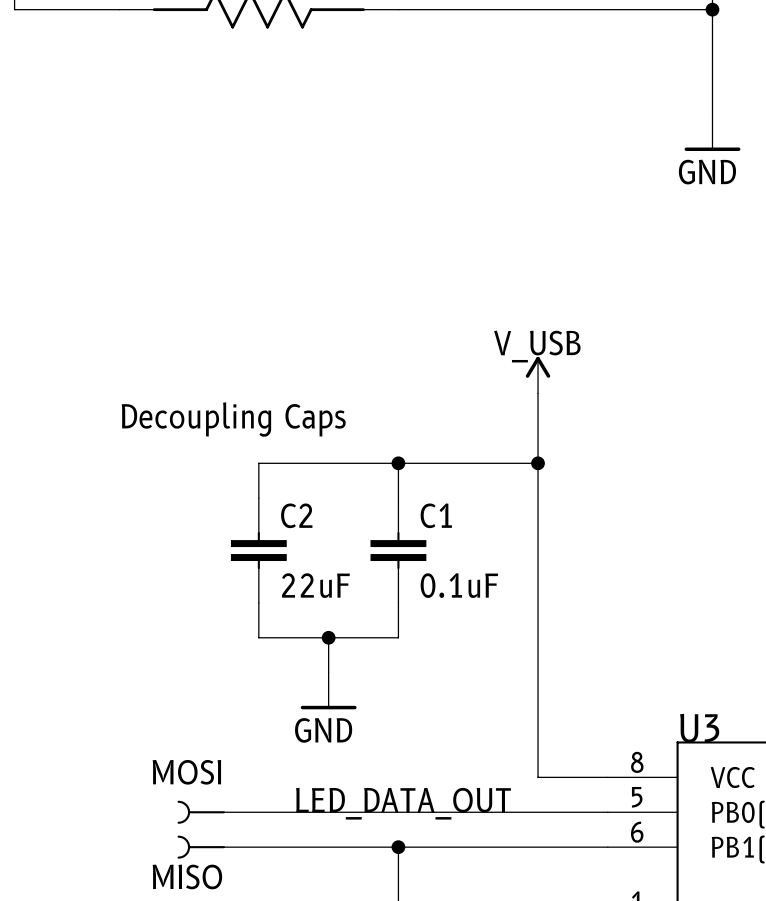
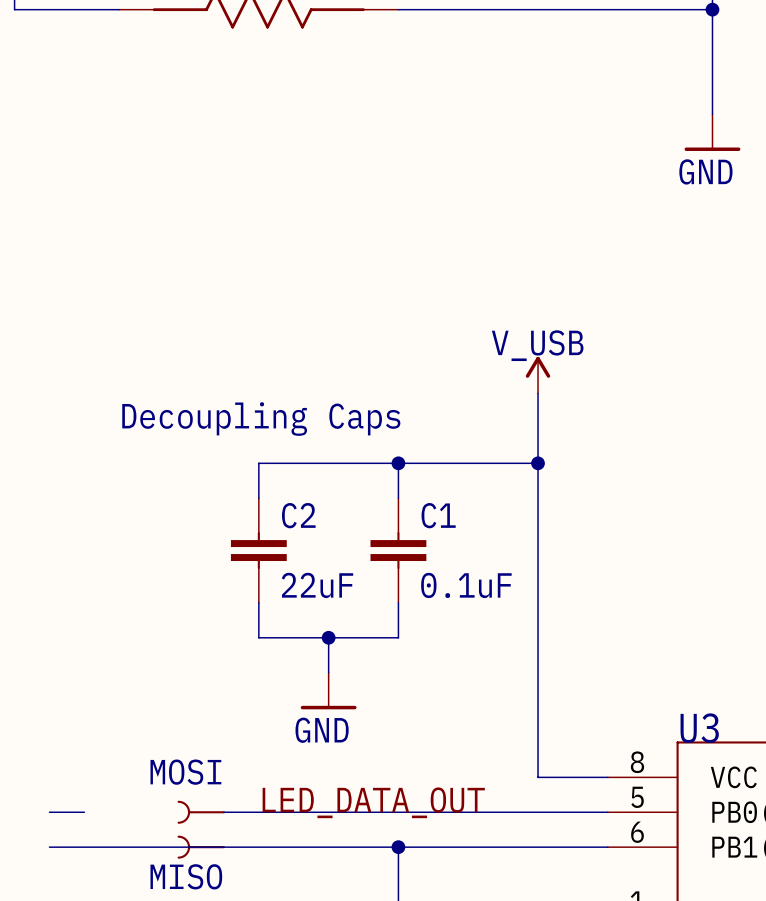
label position: LED_DATA_OUT (403, 803) -> LED_DATA_OUT (373, 802)
wire: none -> (49, 812) (84, 812)
wire: none -> (49, 847) (223, 847)

